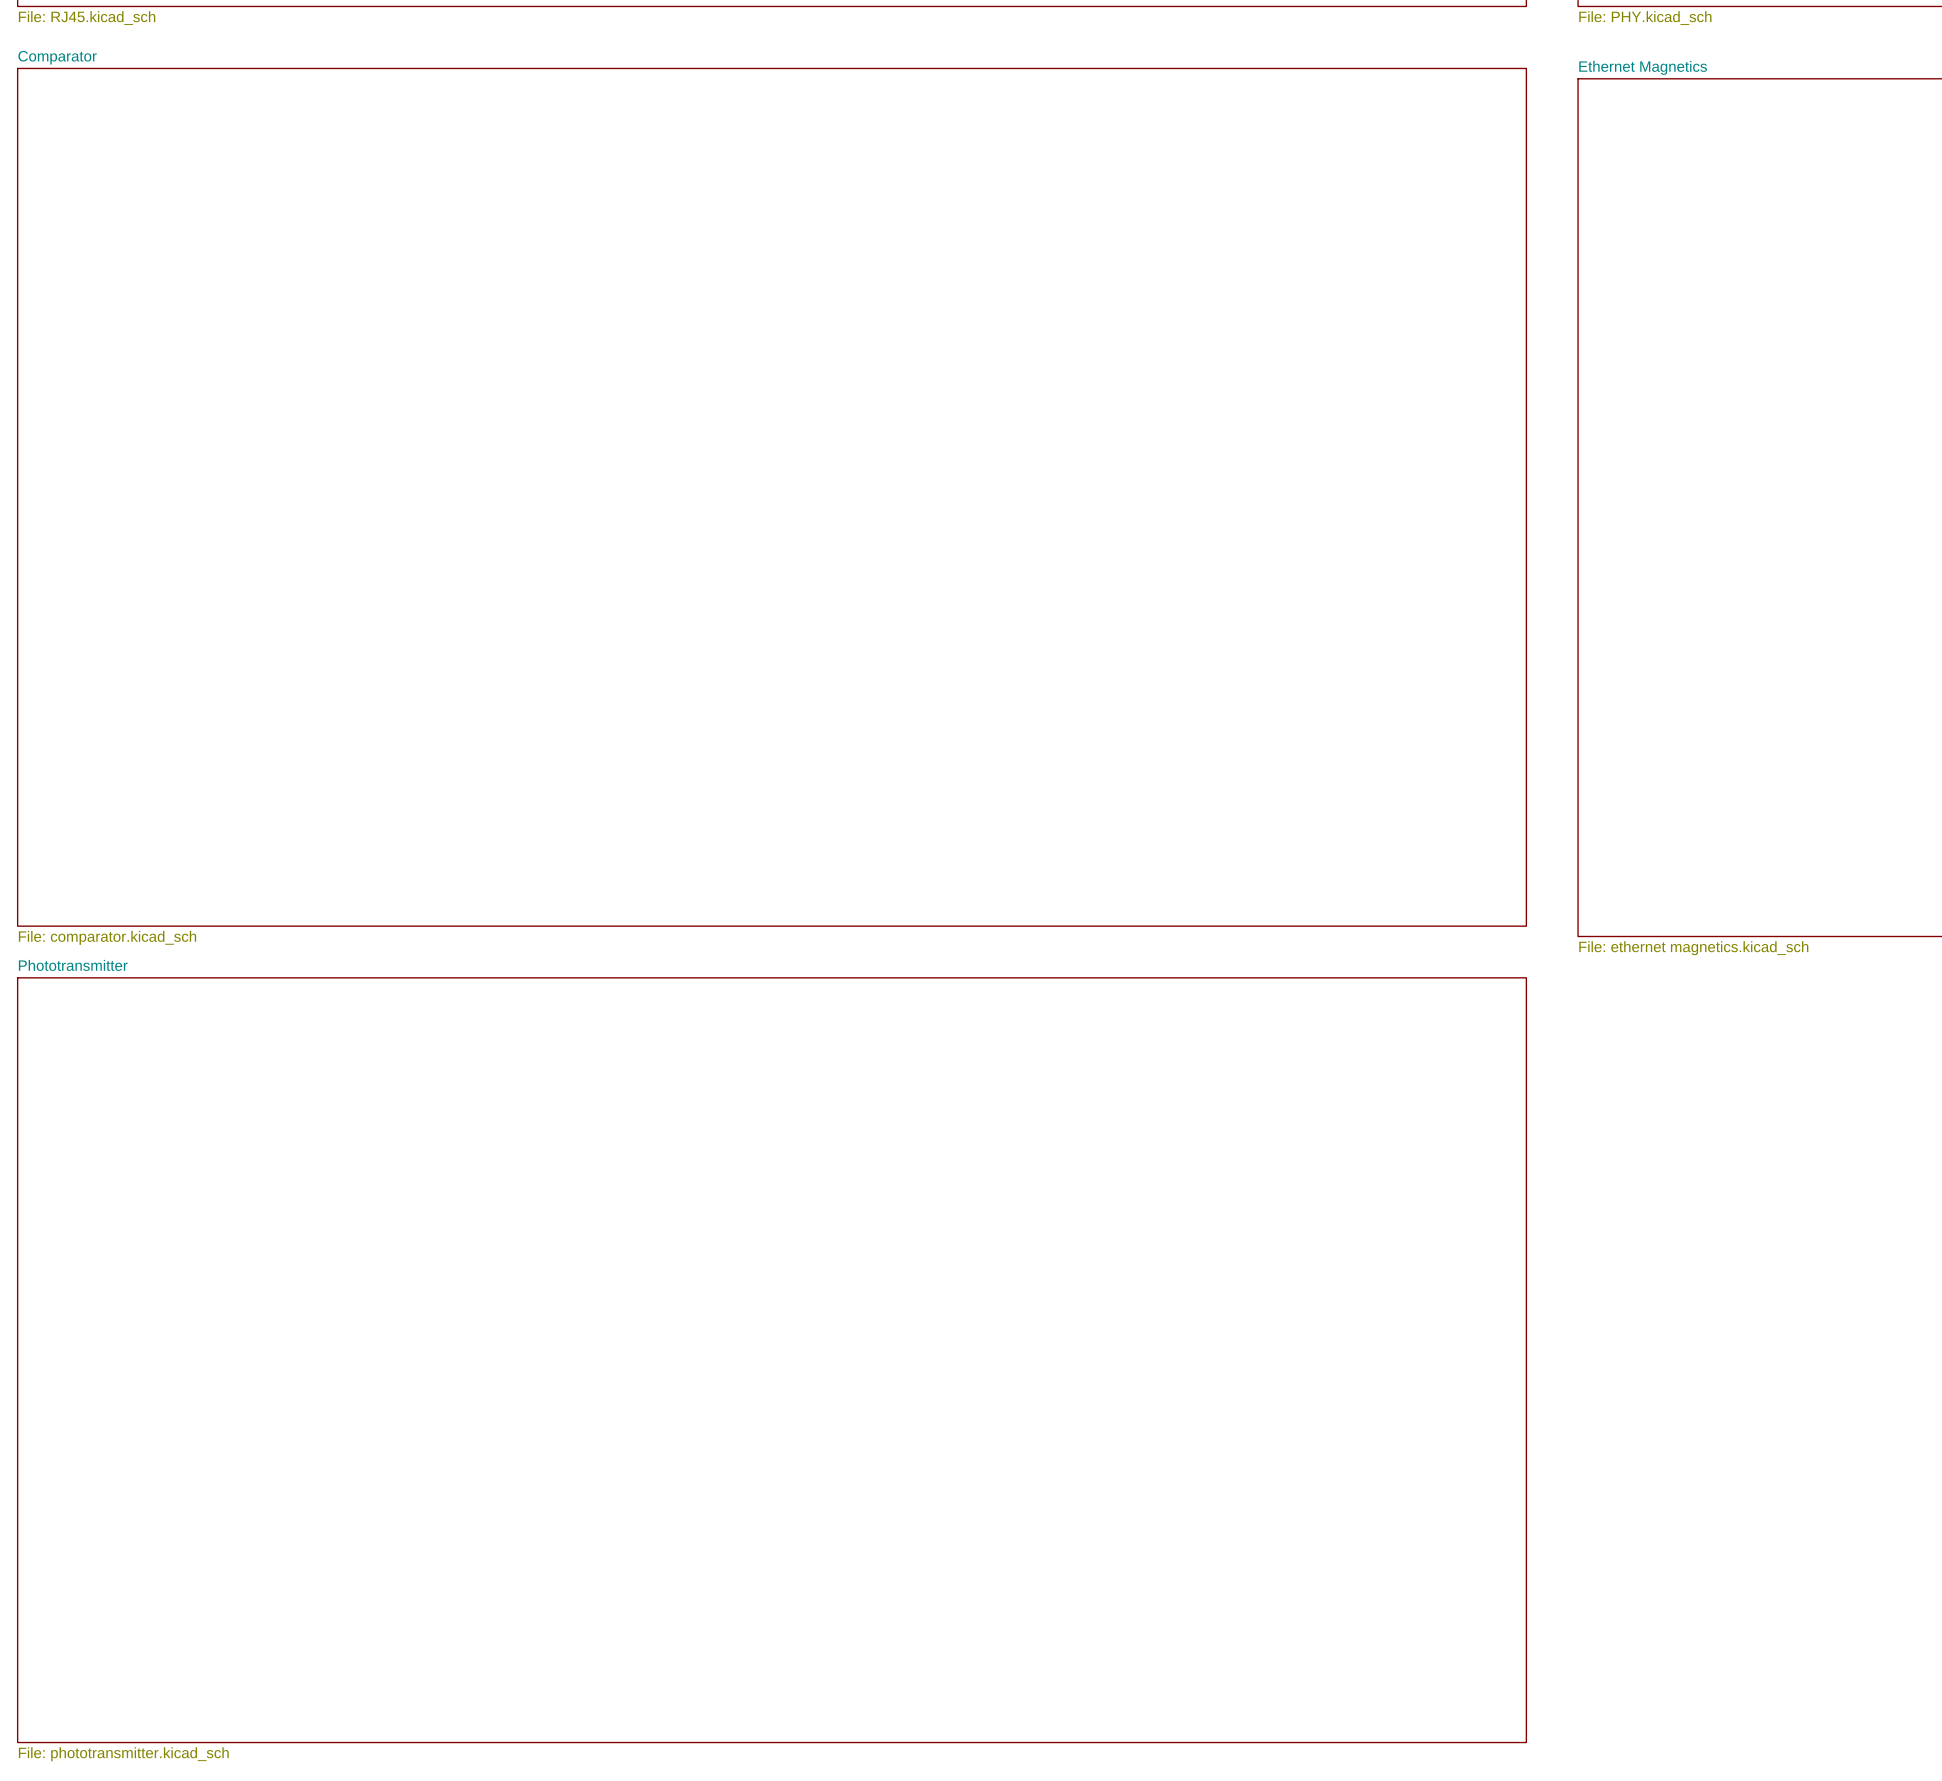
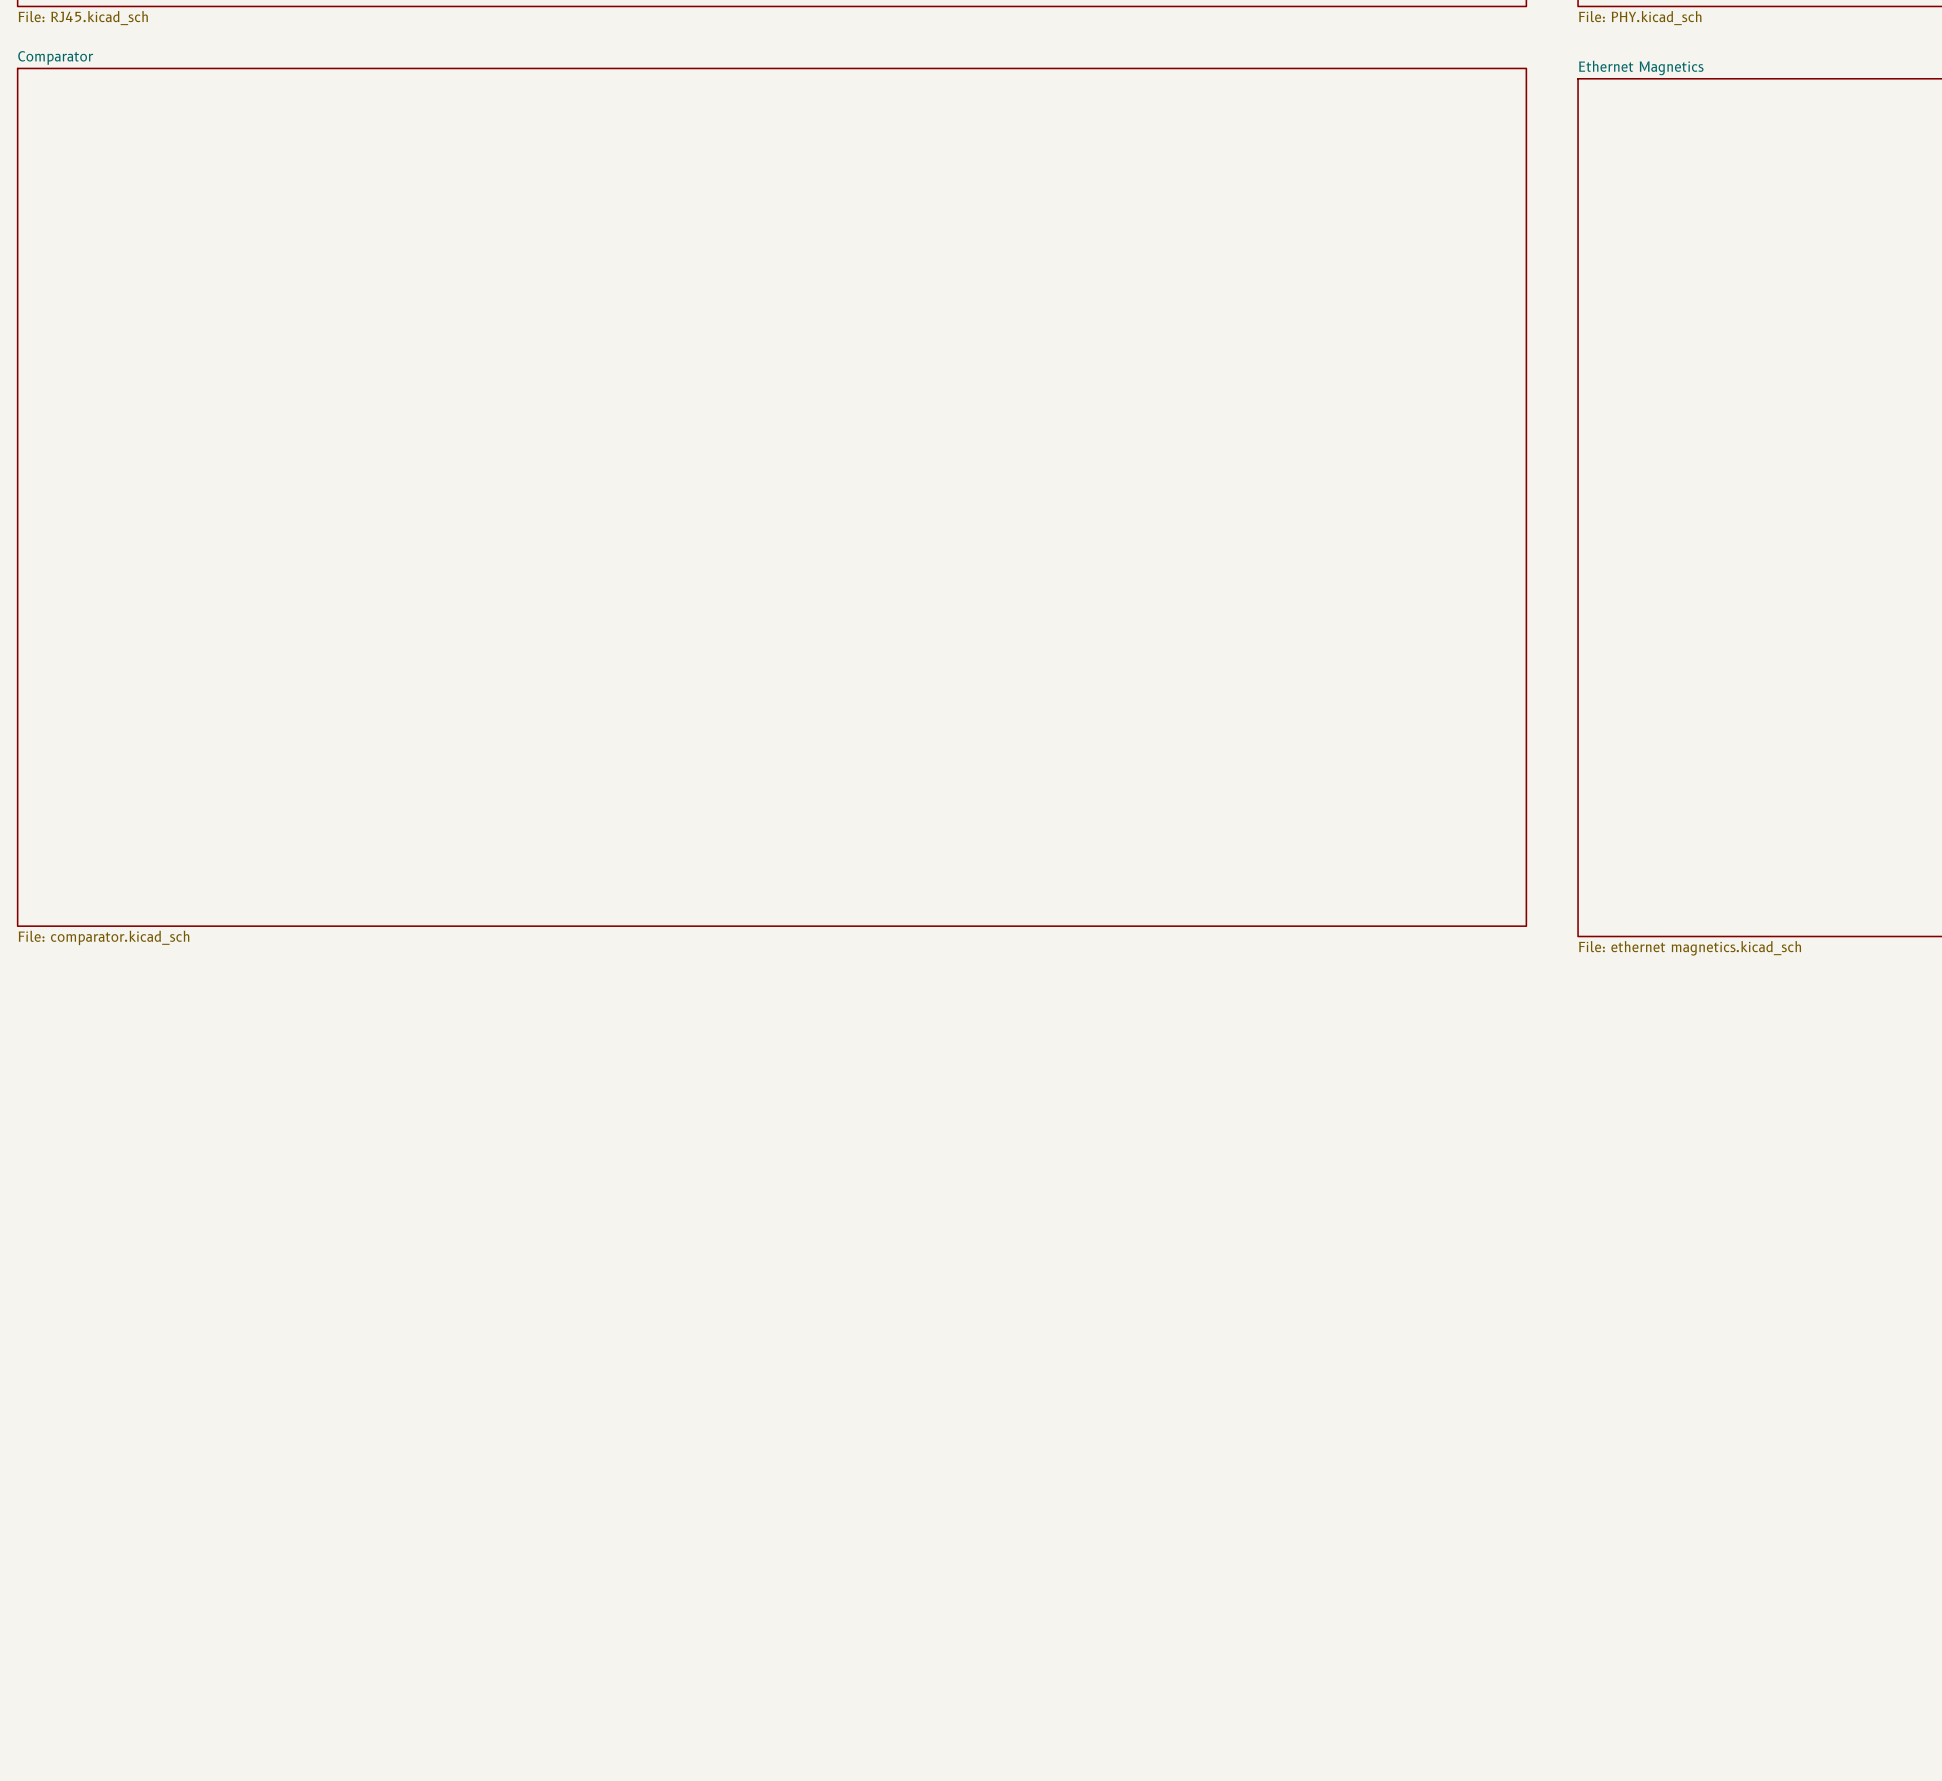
sheet Phototransmitter: File: phototransmitter.kicad_sch (772, 1360) -> none

